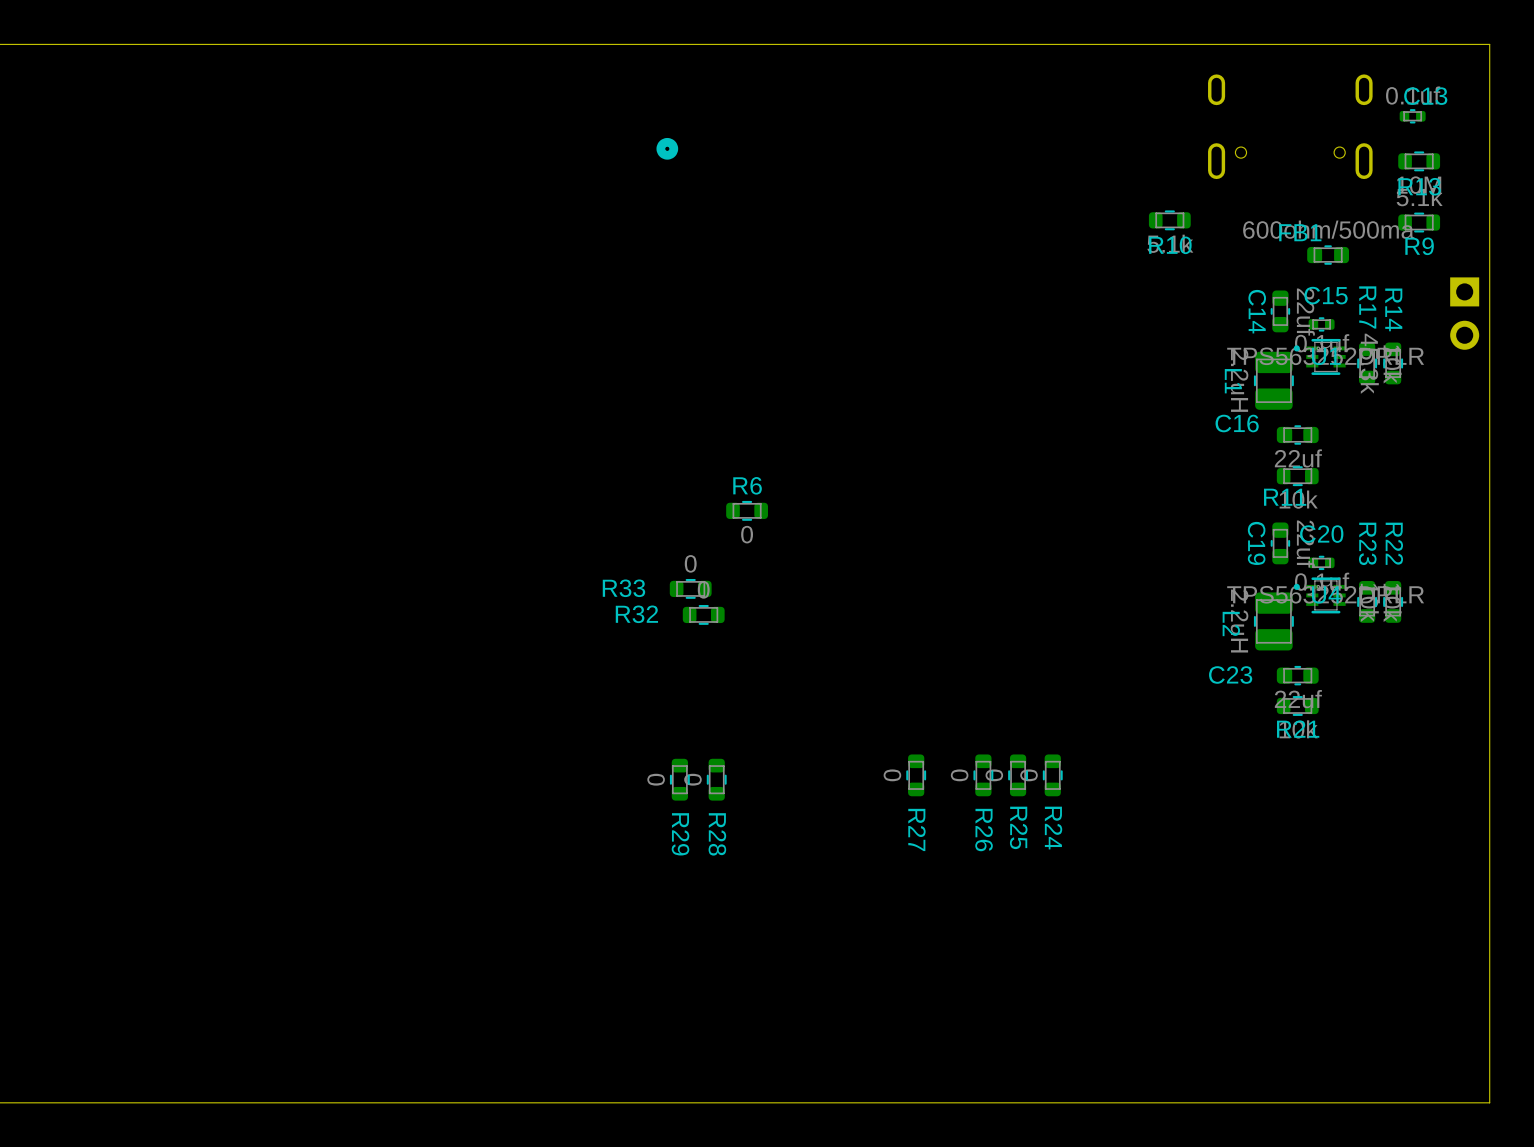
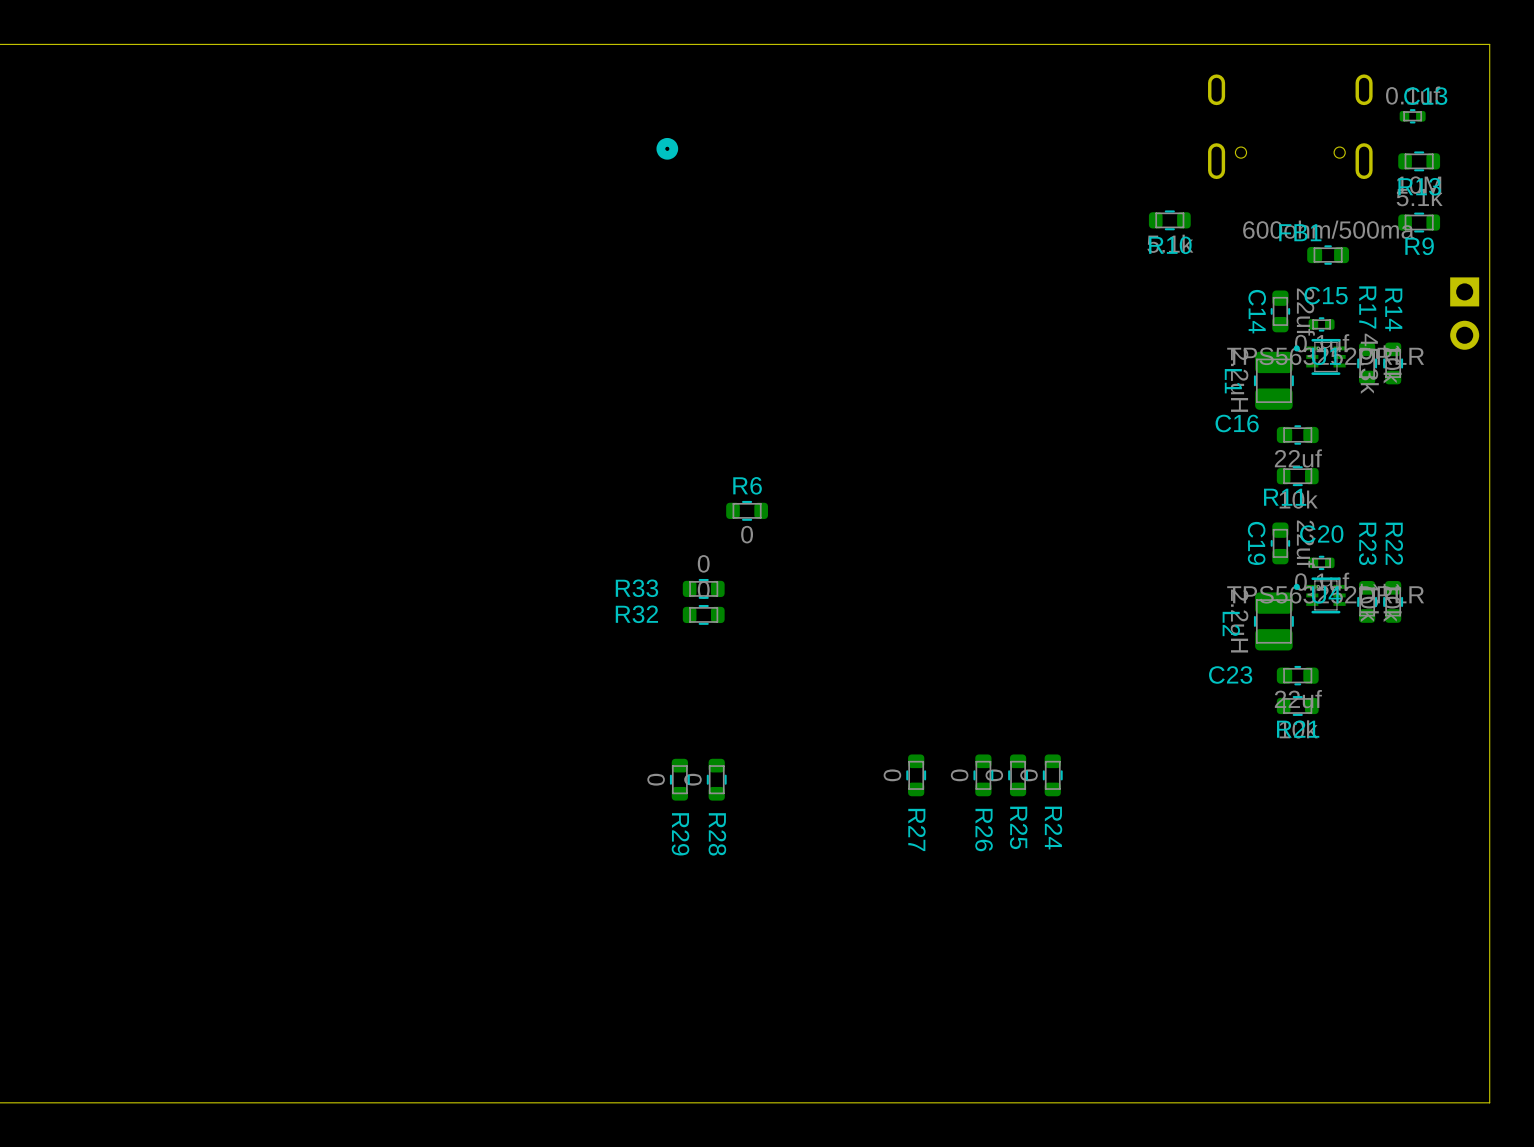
R33 position: (690, 588) -> (703, 588)

